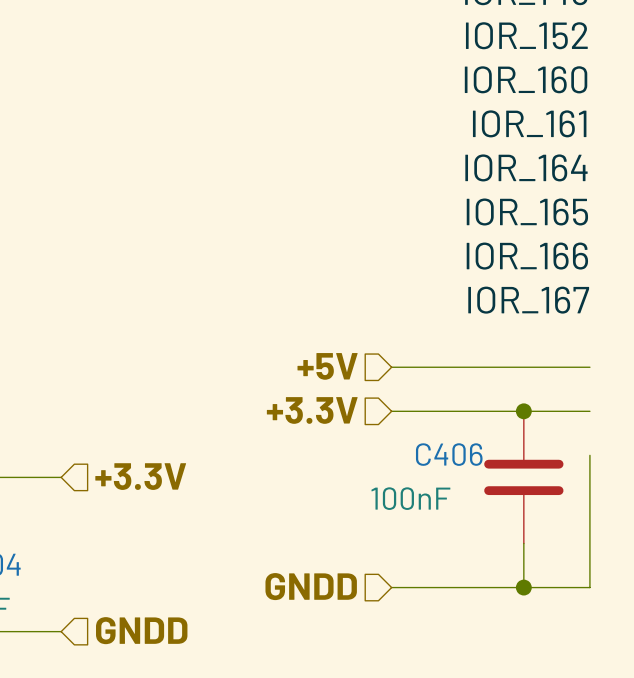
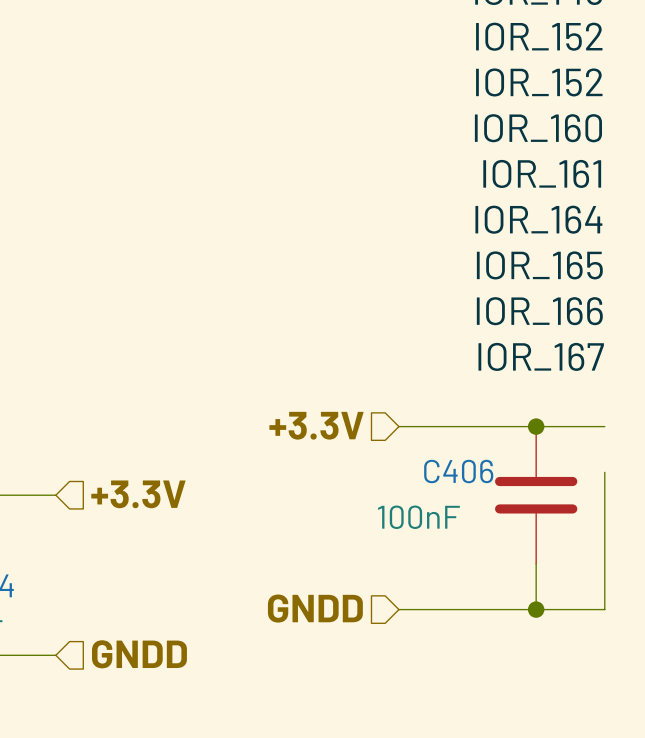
label: IOR_160 (526, 79) -> IOR_152 (539, 82)
label: IOR_161 (529, 123) -> IOR_160 (538, 128)
label: IOR_164 (526, 167) -> IOR_161 (542, 173)
label: IOR_165 (527, 212) -> IOR_164 (538, 219)
label: IOR_166 (527, 256) -> IOR_165 (539, 265)
label: IOR_167 (528, 300) -> IOR_166 (539, 311)
label: none -> IOR_167 (541, 356)
hierarchical label: +5V (327, 366) -> none
wire: (391, 367) (589, 367) -> none

